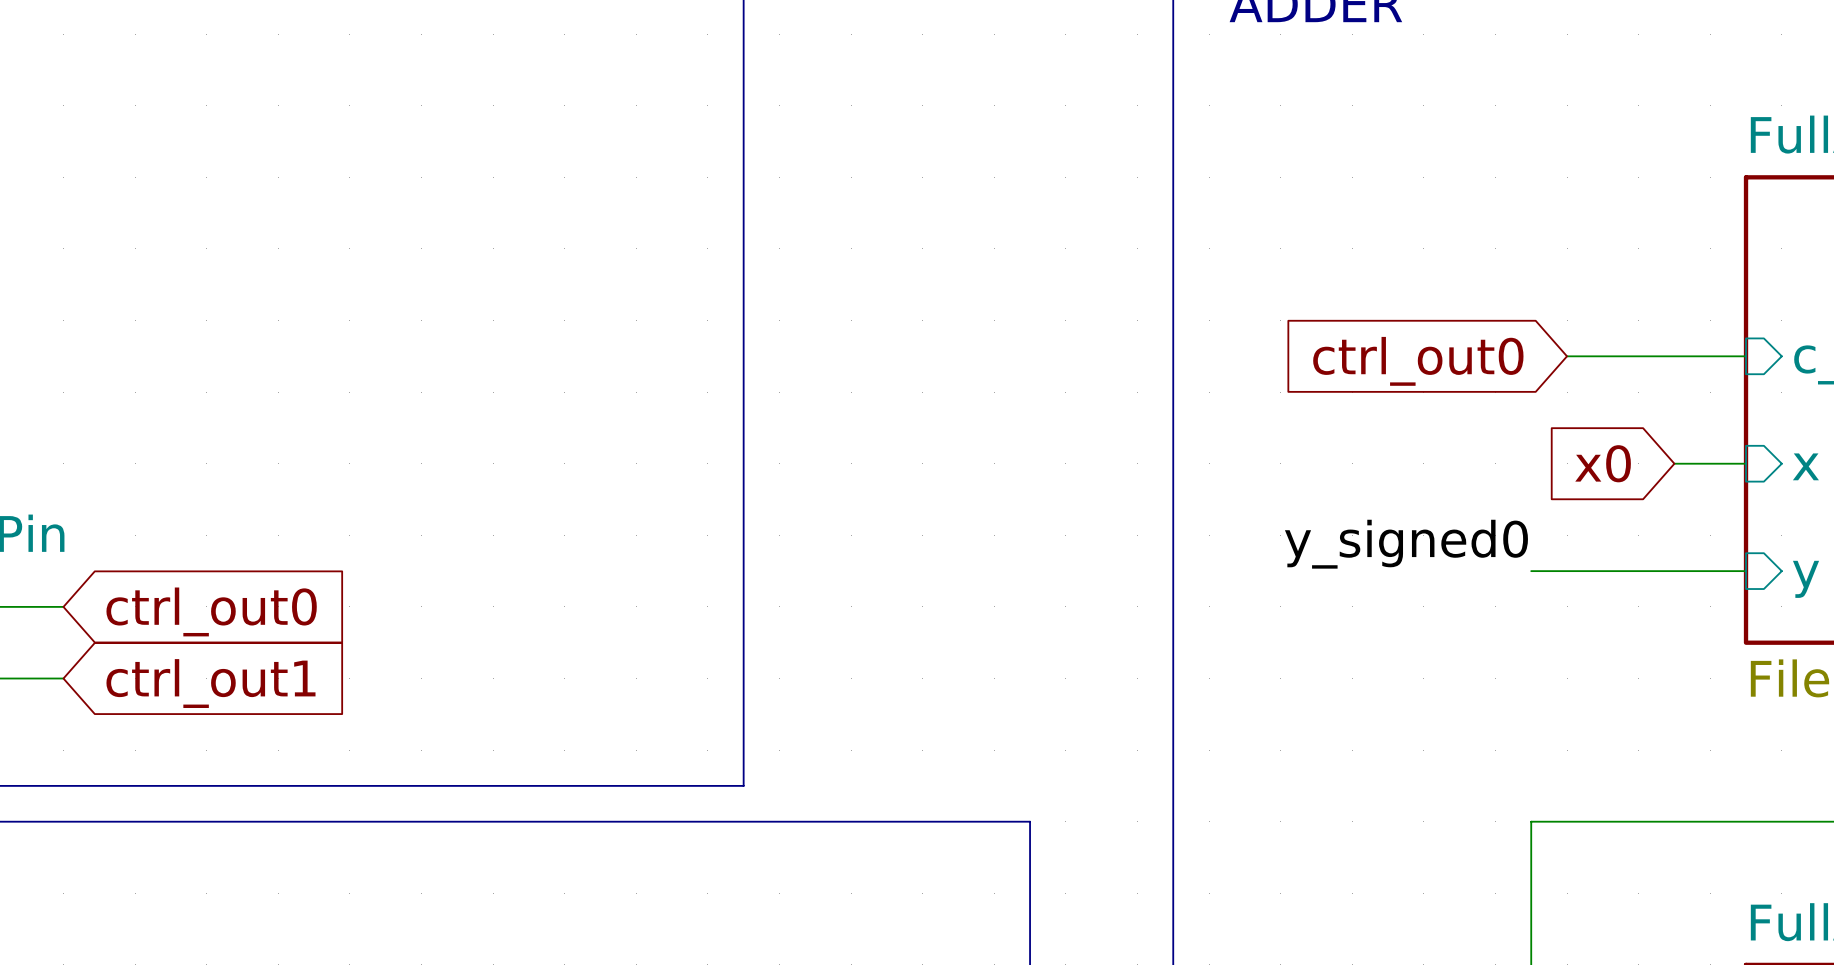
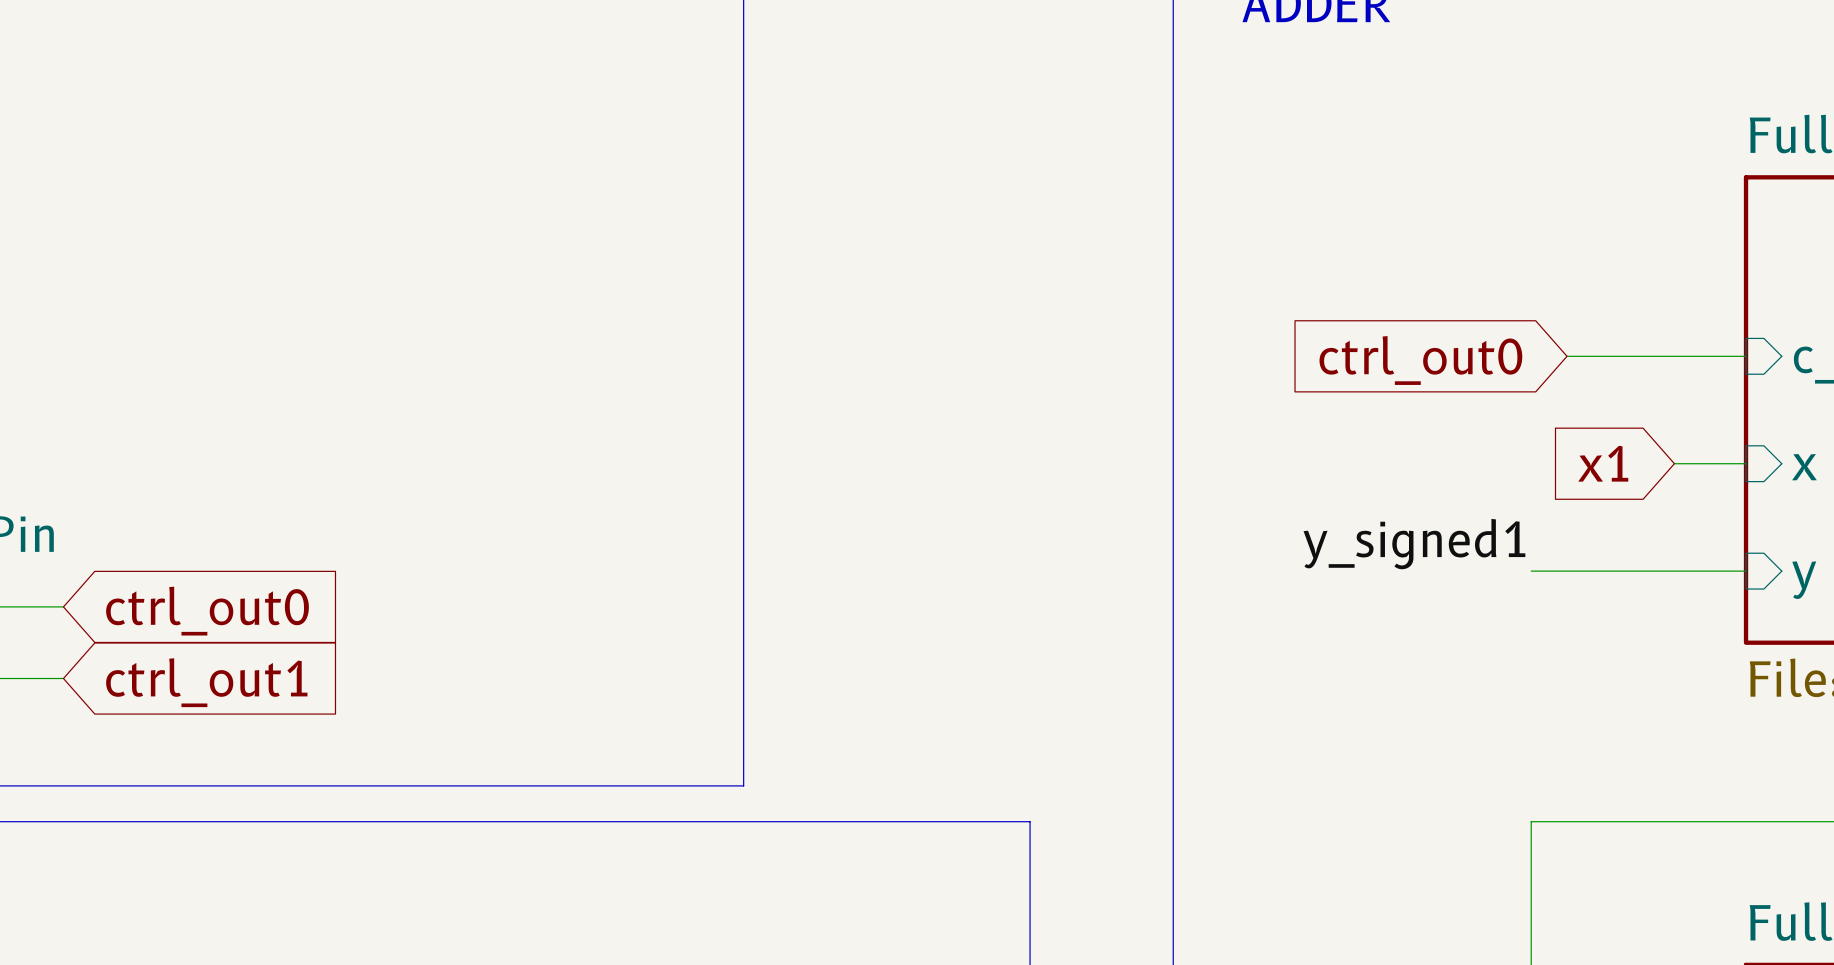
global label: x0 (1603, 463) -> x1 (1603, 463)
label: y_signed0 (1406, 544) -> y_signed1 (1414, 544)

